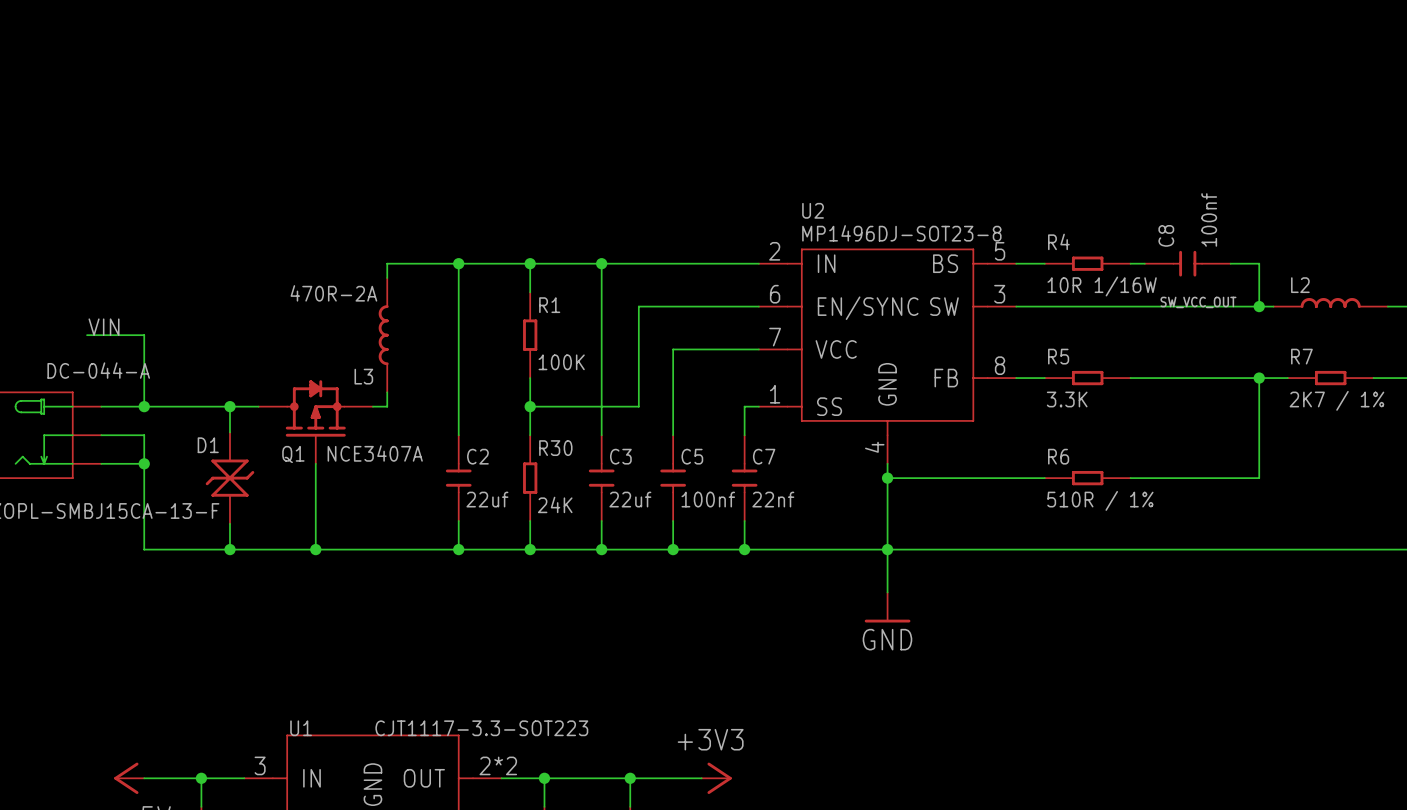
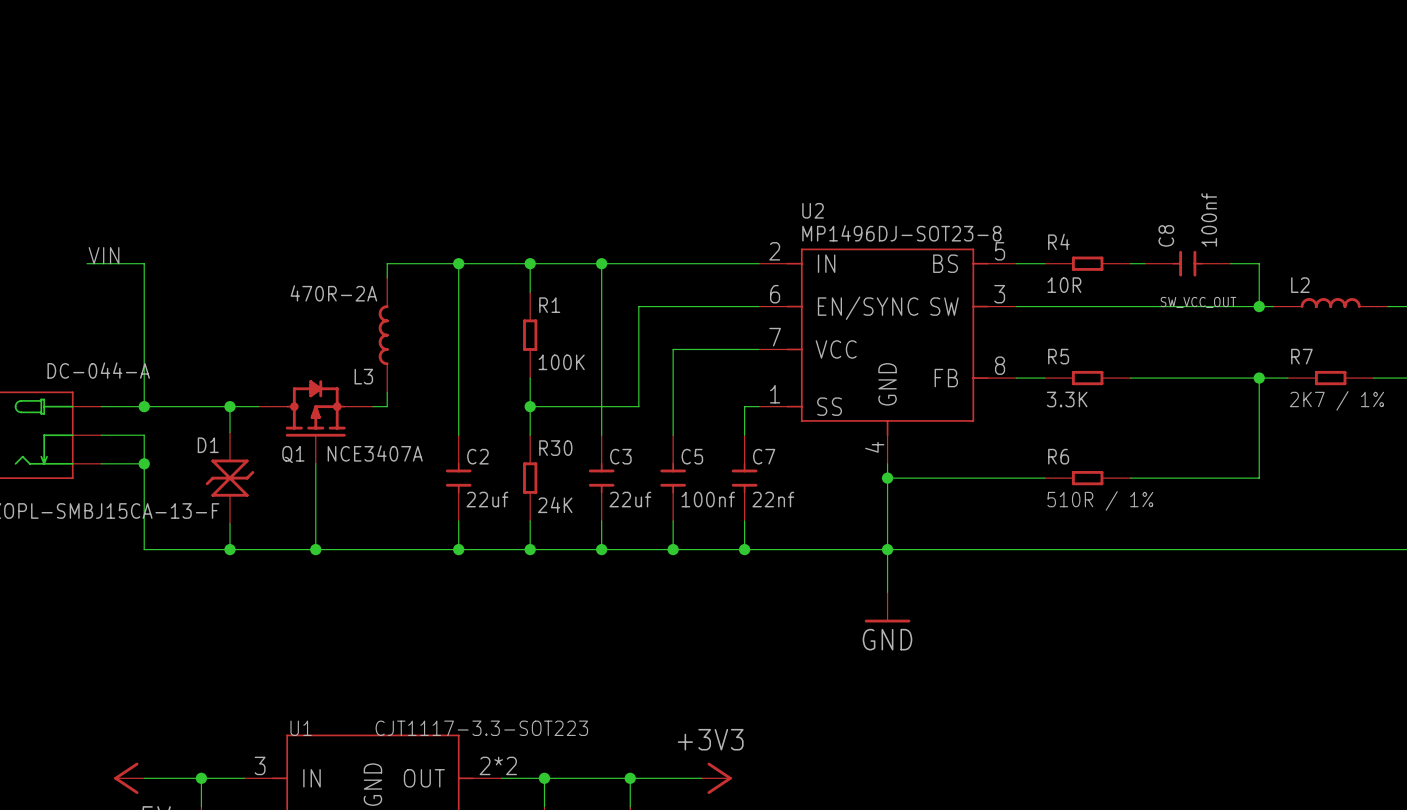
R4 value: 10R 1/16W (1102, 286) -> 10R (1064, 285)
label position: VIN (104, 327) -> VIN (104, 255)
wire: (87, 335) (144, 335) -> (87, 263) (144, 263) (144, 335)

